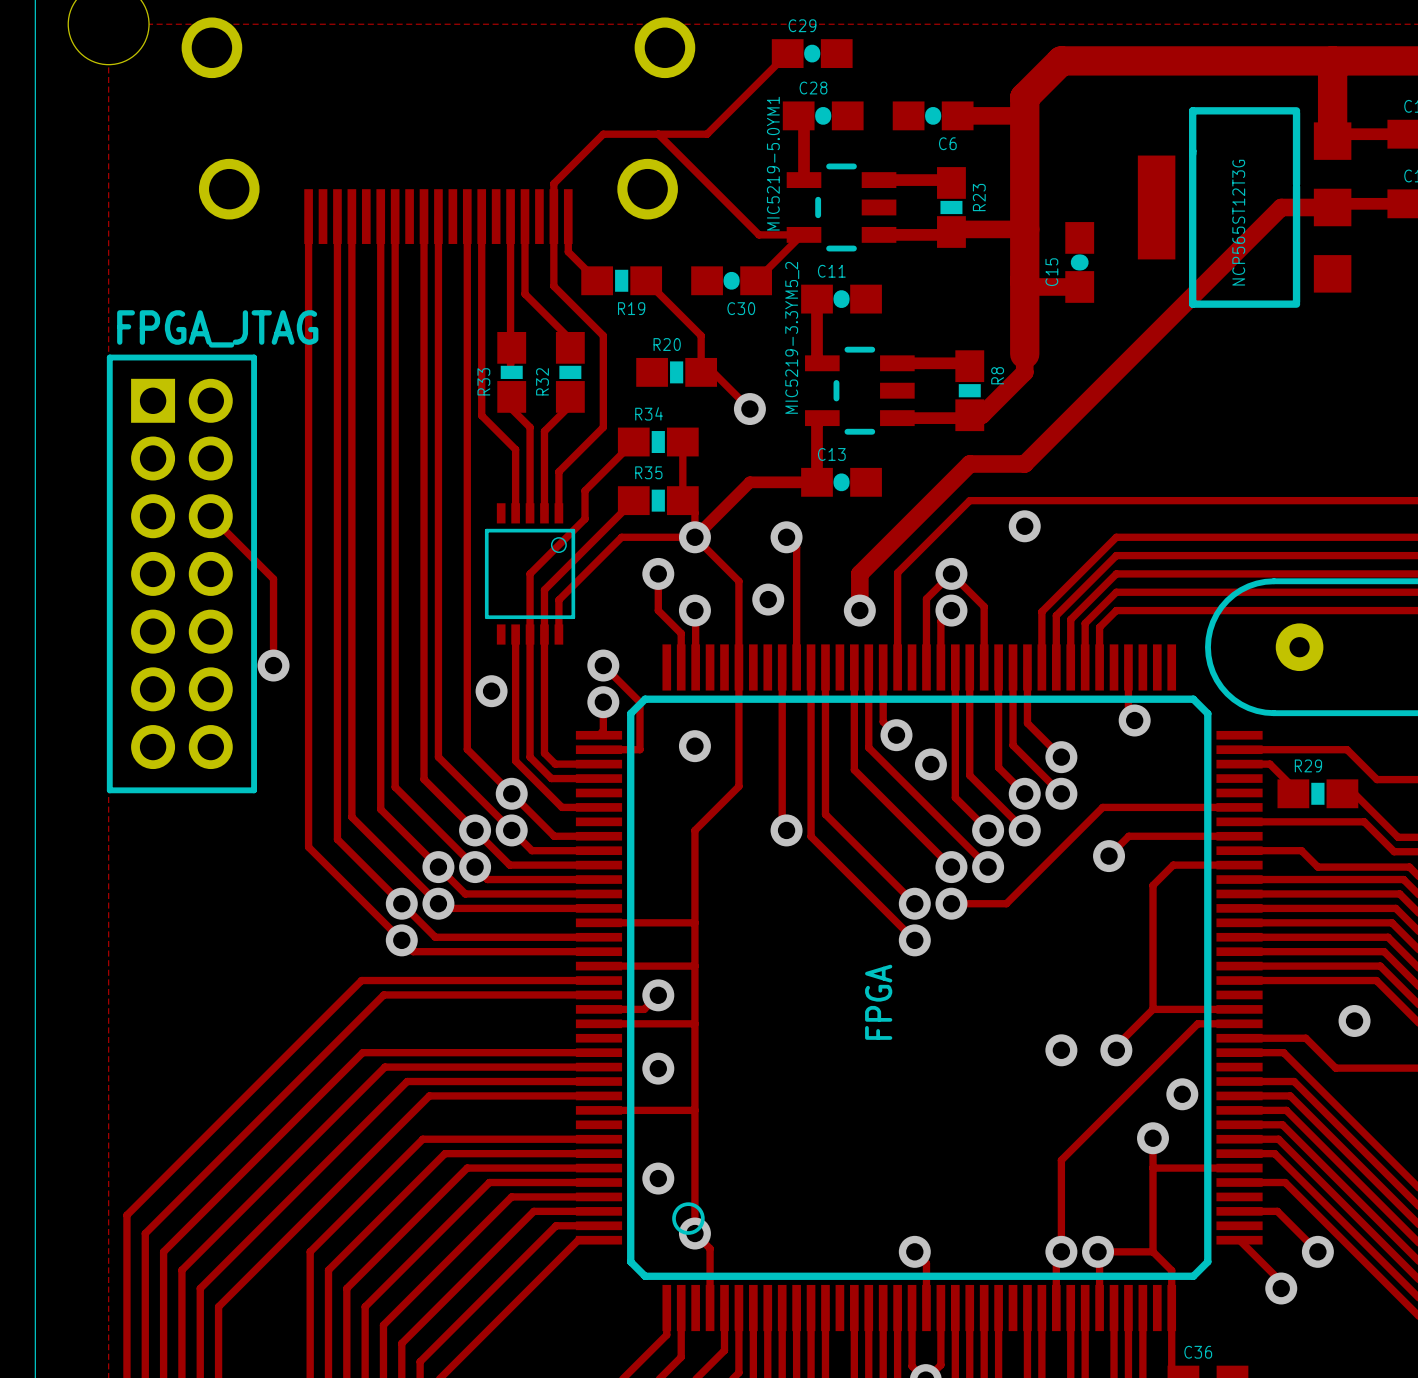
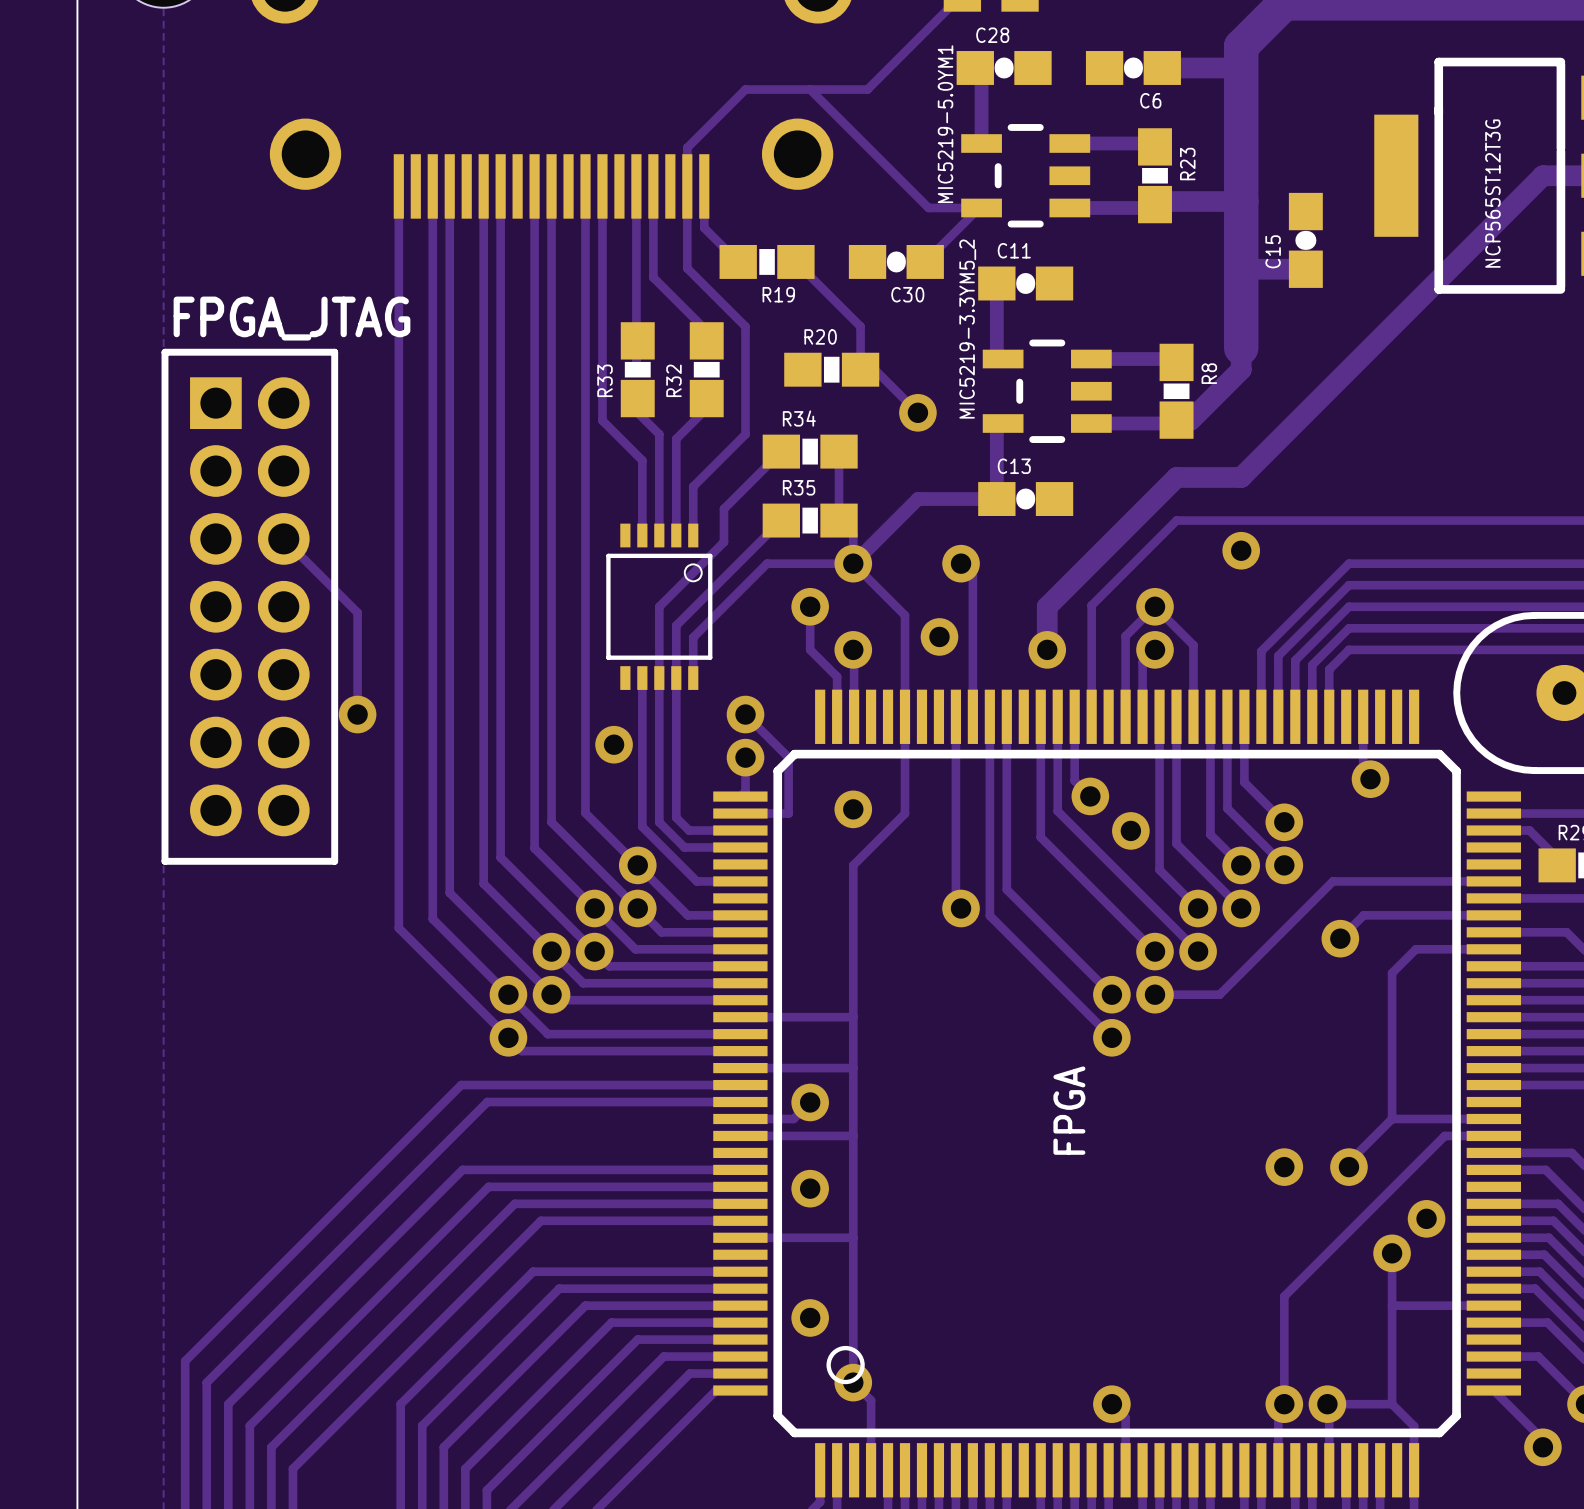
track: (738, 749) (738, 786) (694, 830) -> (905, 813) (853, 865) (853, 908)
via position: (1153, 1138) -> (1392, 1253)

